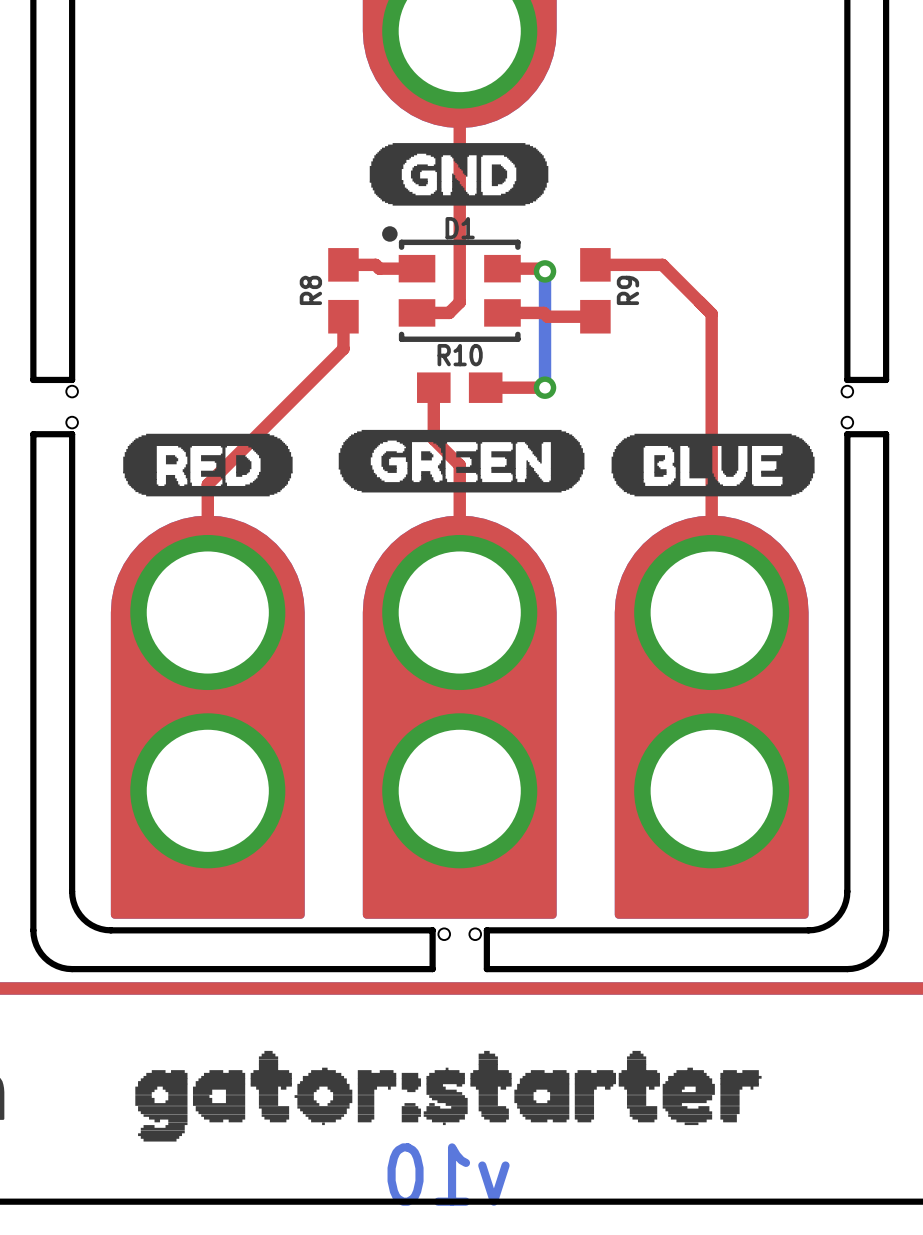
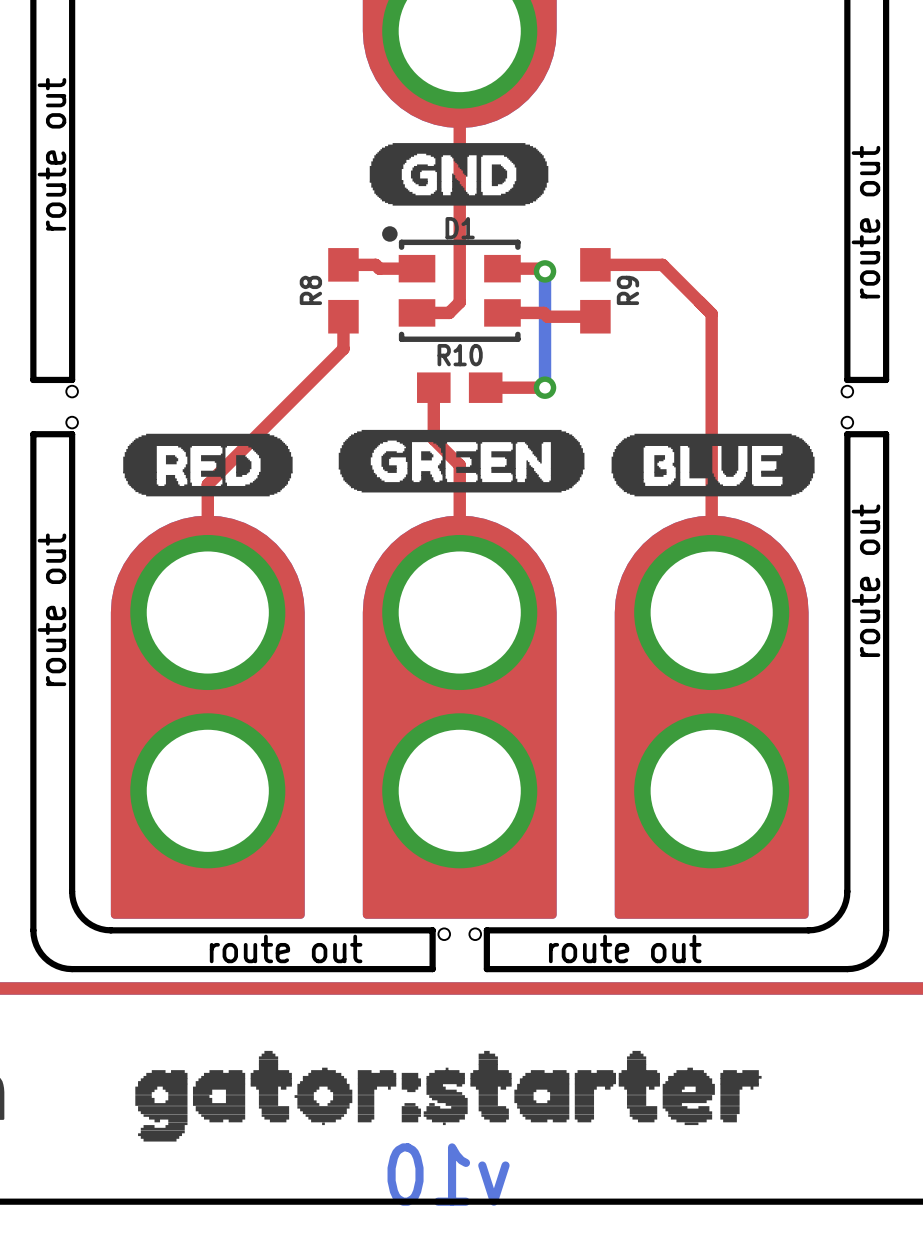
text: none -> route out (51, 154)
text: none -> route out (865, 222)
text: none -> route out (865, 580)
text: none -> route out (51, 609)
text: none -> route out (286, 948)
text: none -> route out (625, 948)

